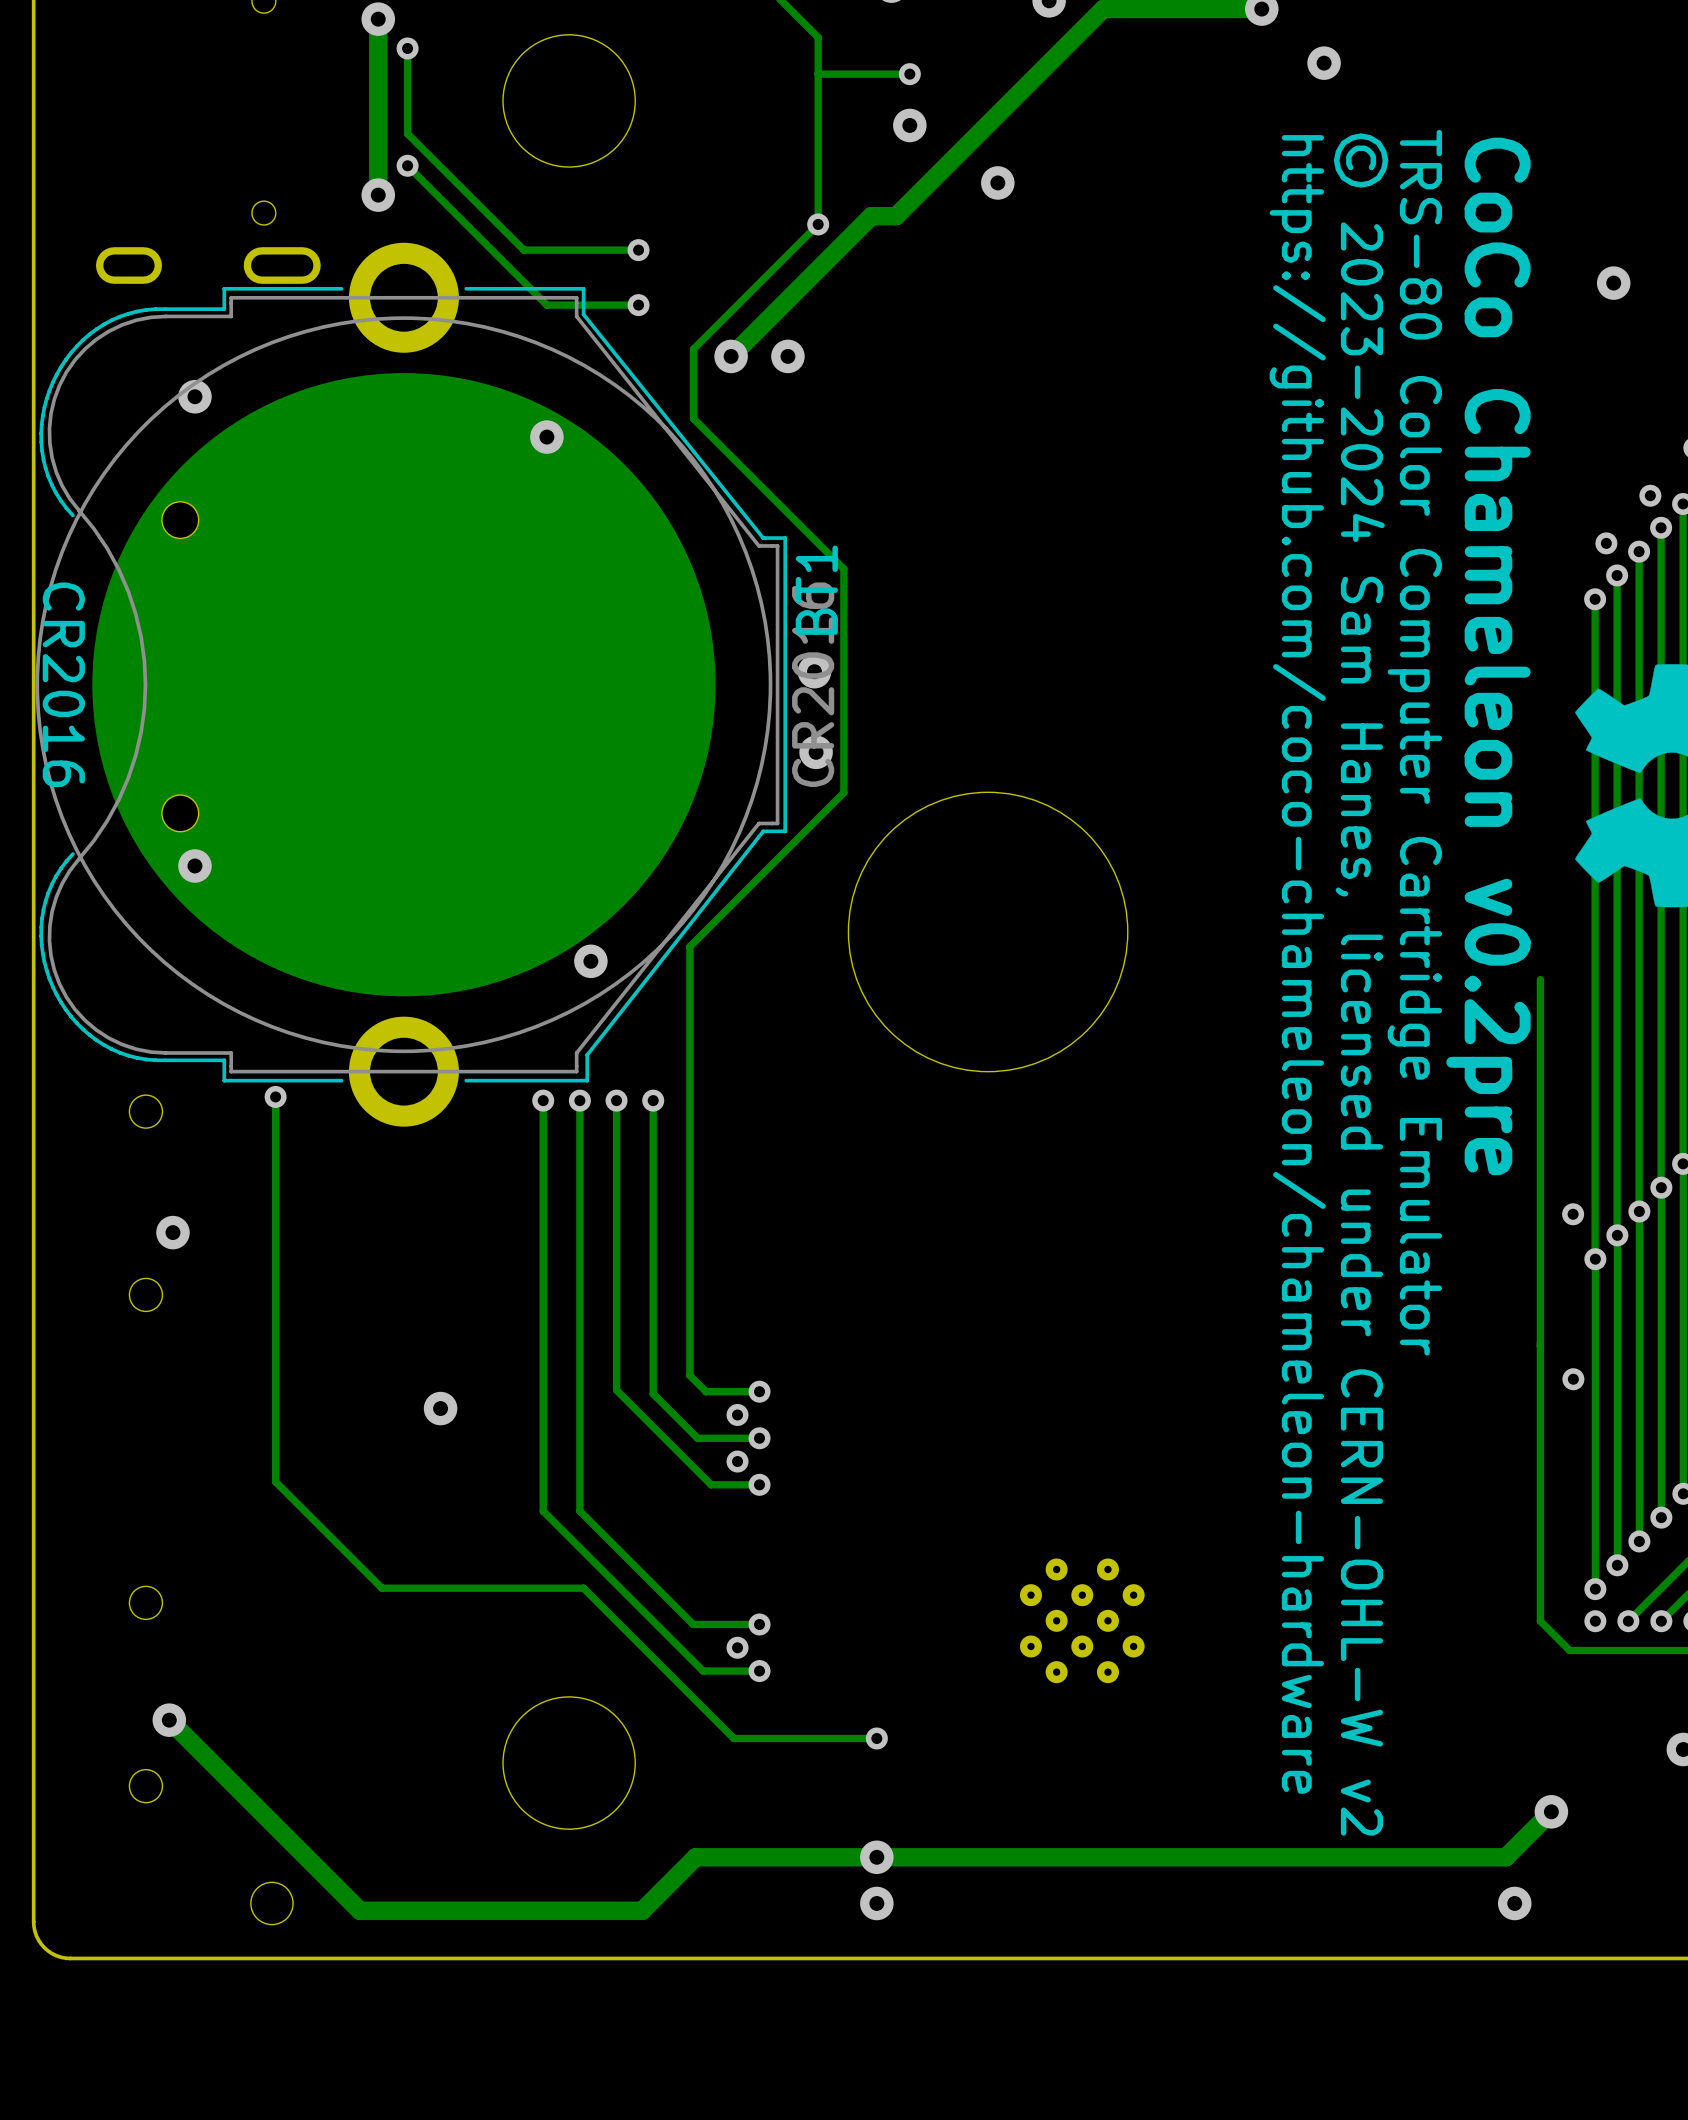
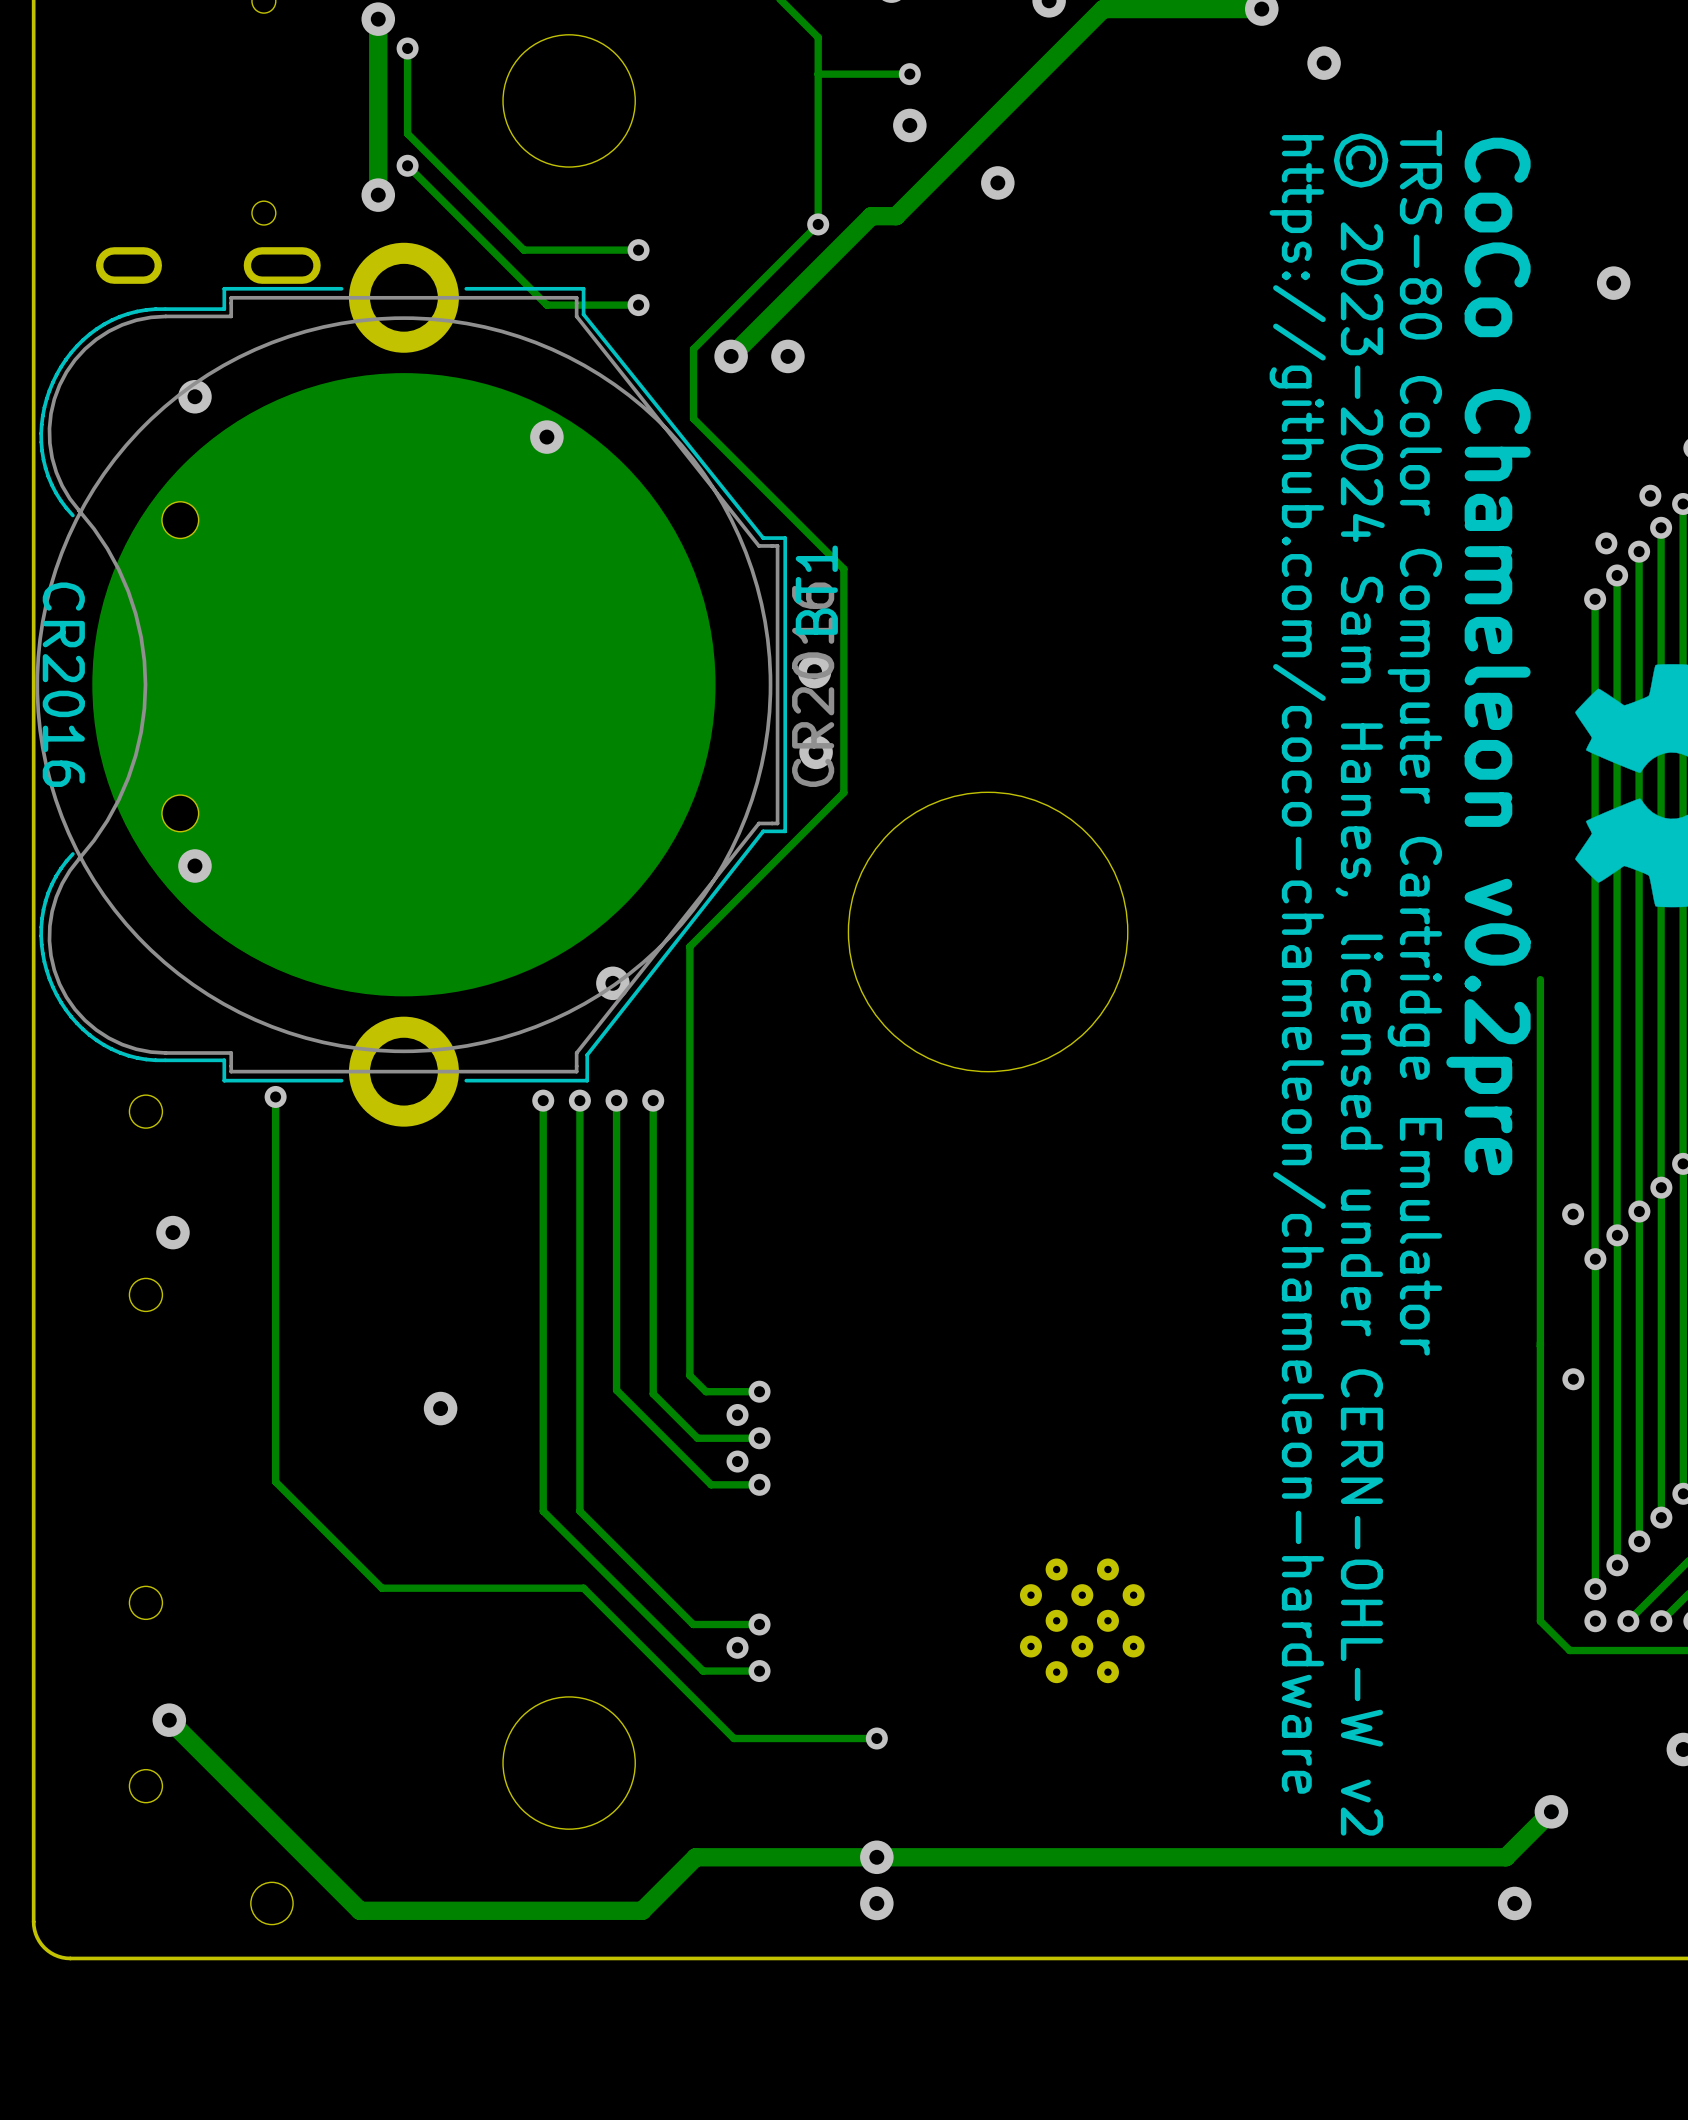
via position: (590, 961) -> (612, 983)

